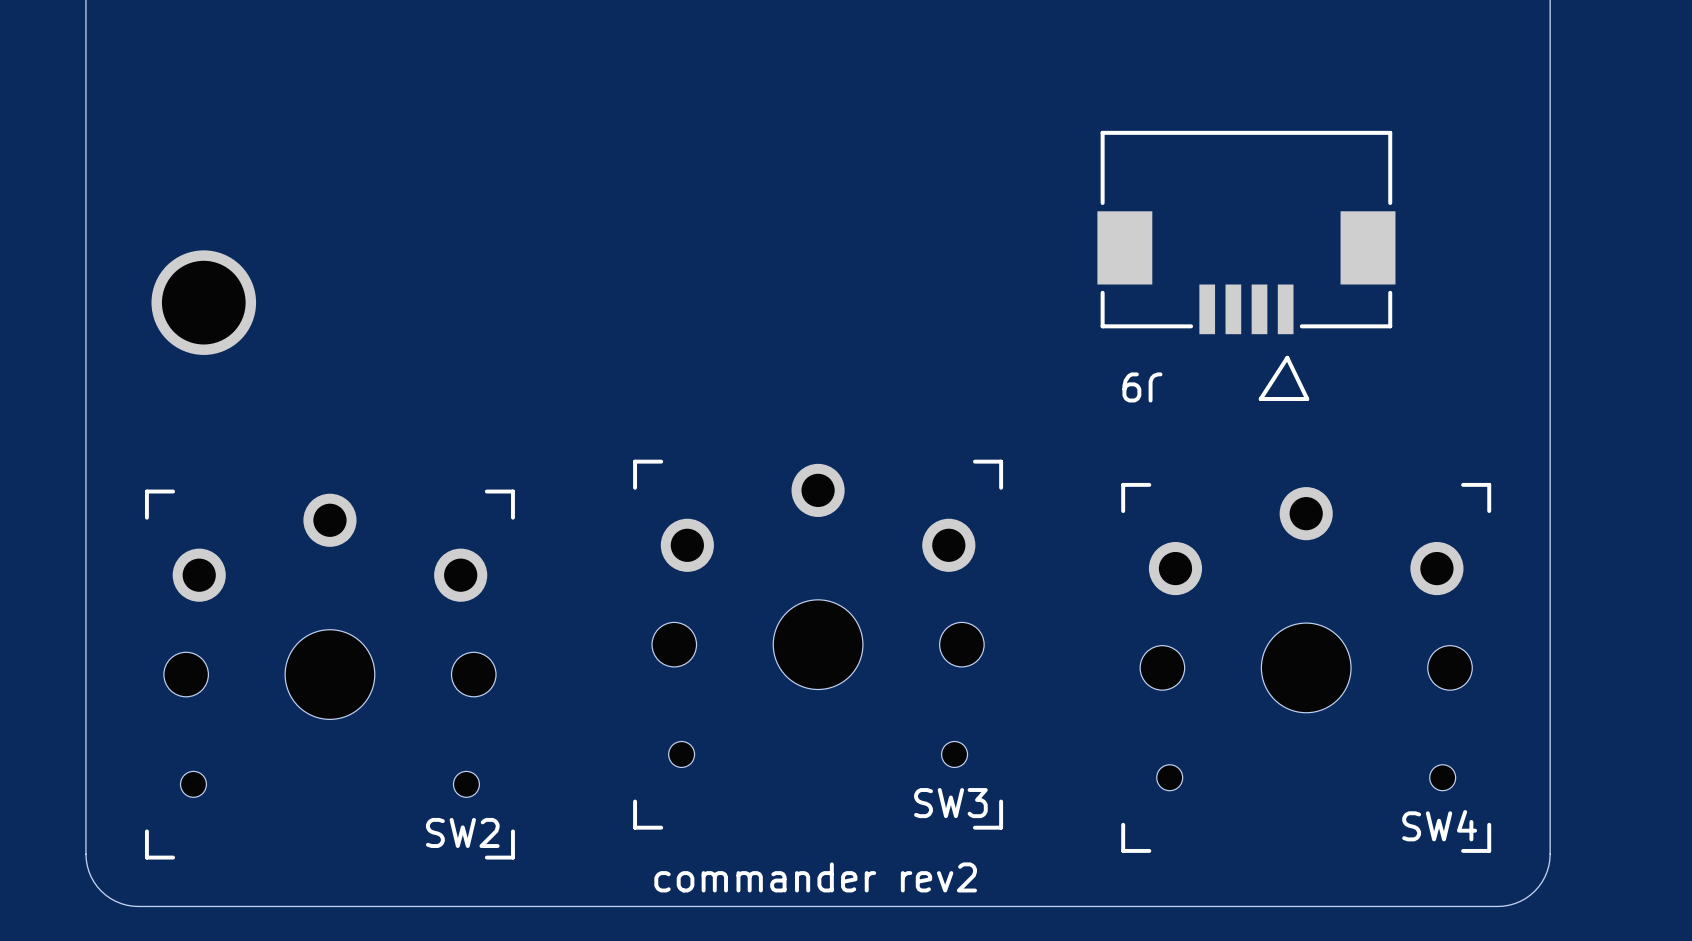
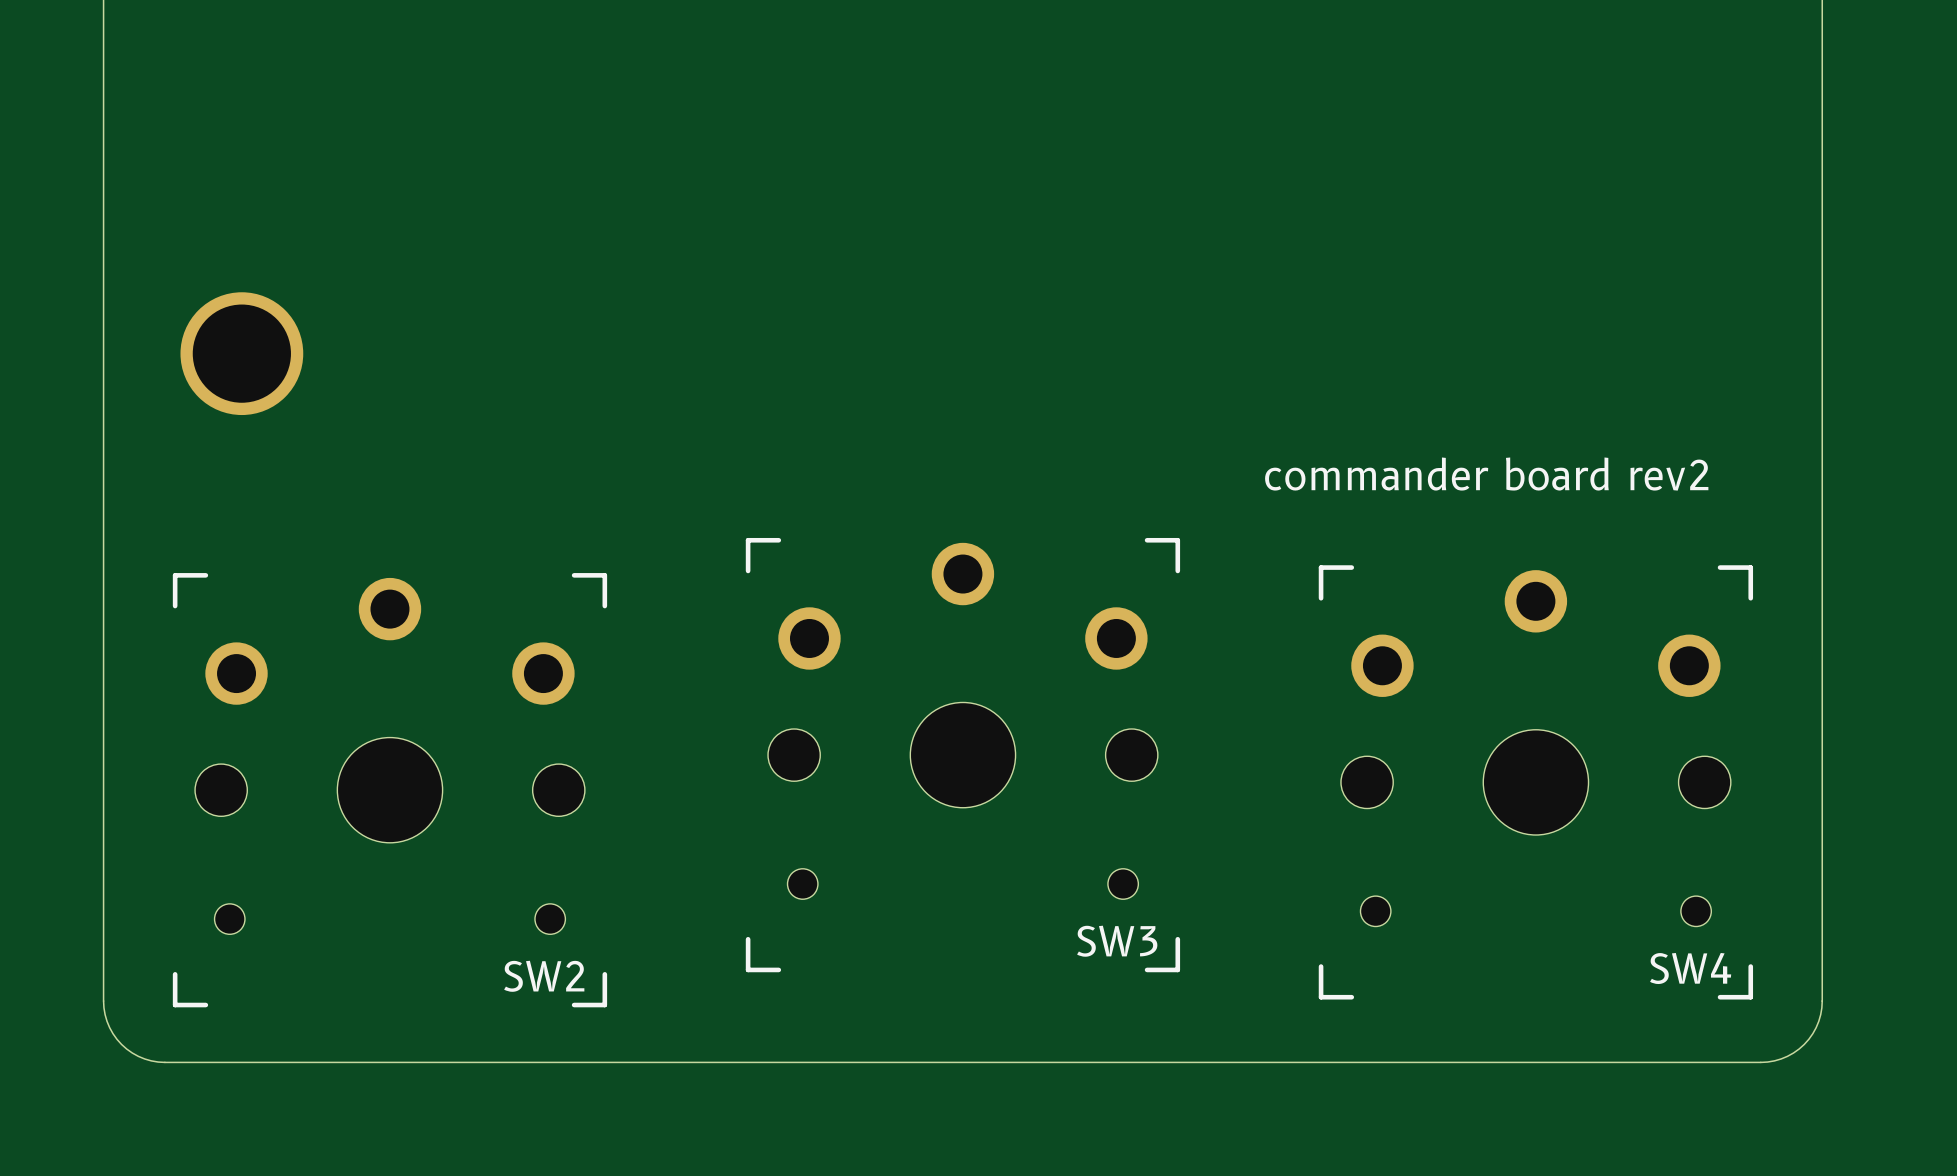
J9: (1246, 265) -> none
text: none -> commander board rev2 (1486, 474)
text: commander rev2 (815, 877) -> none

